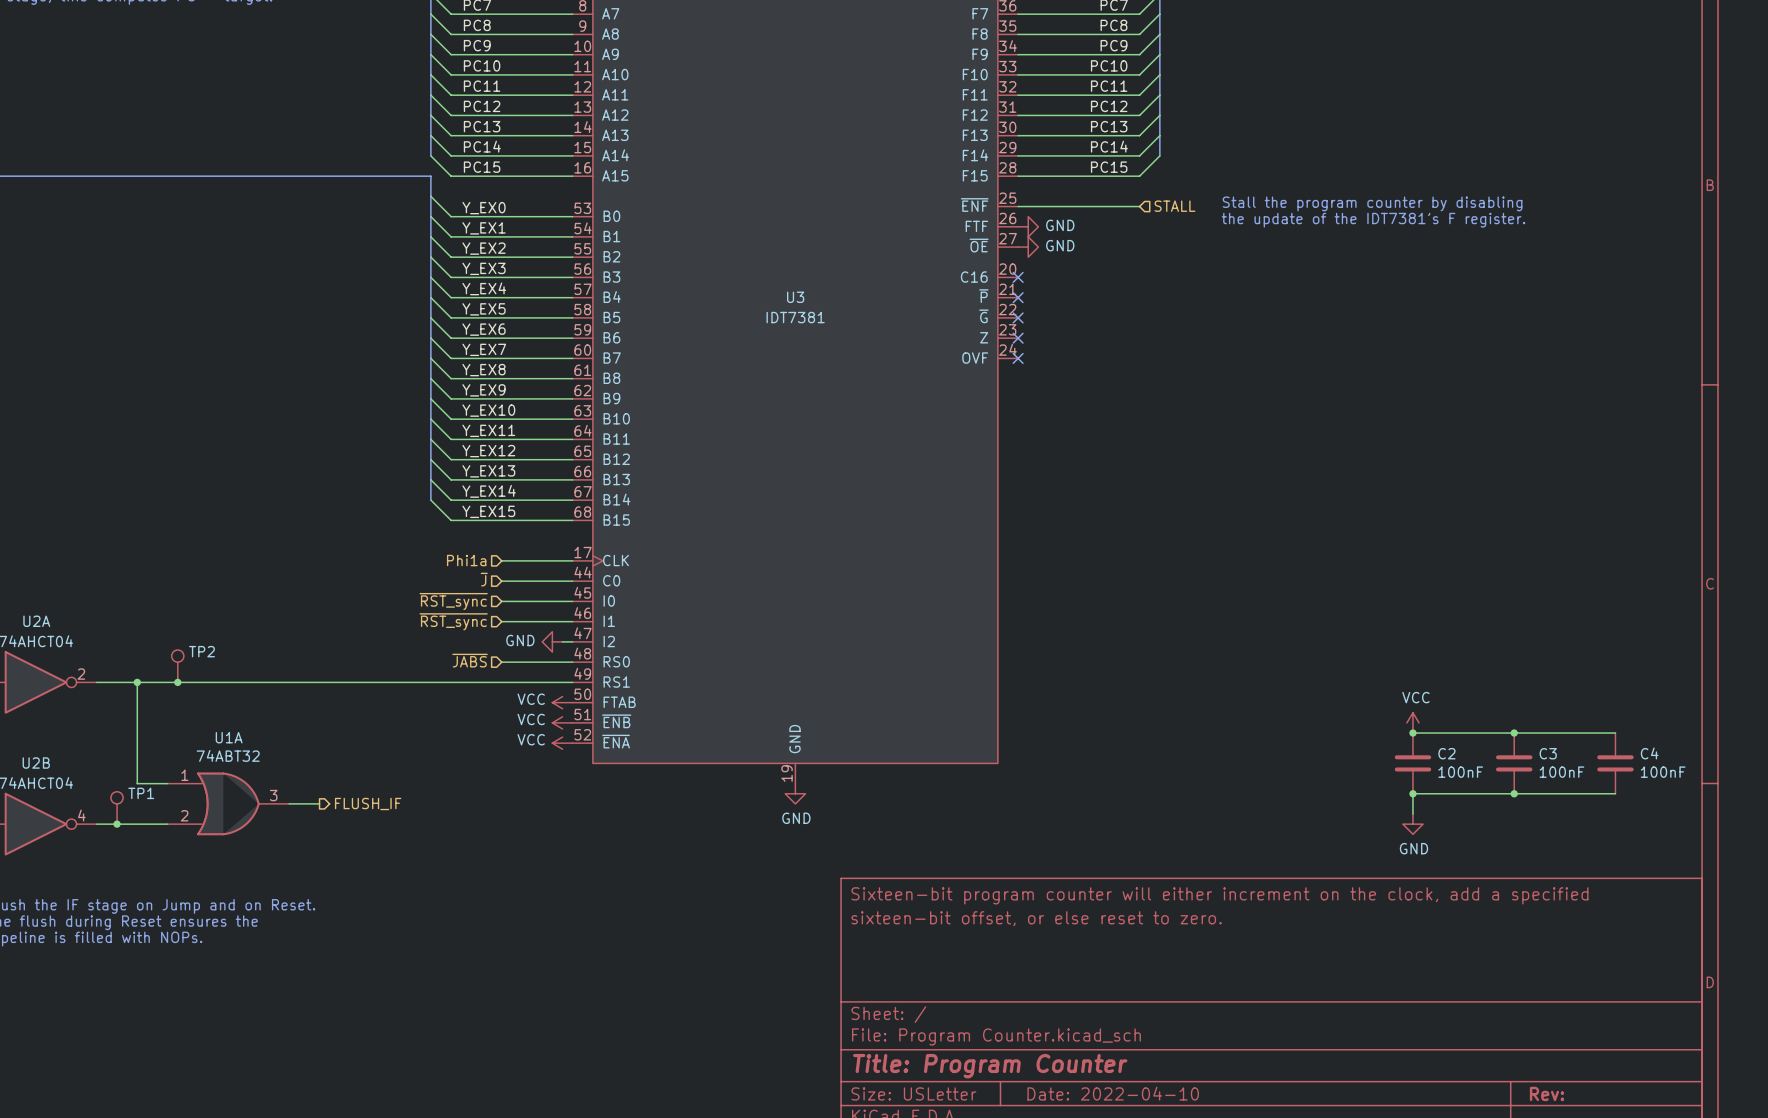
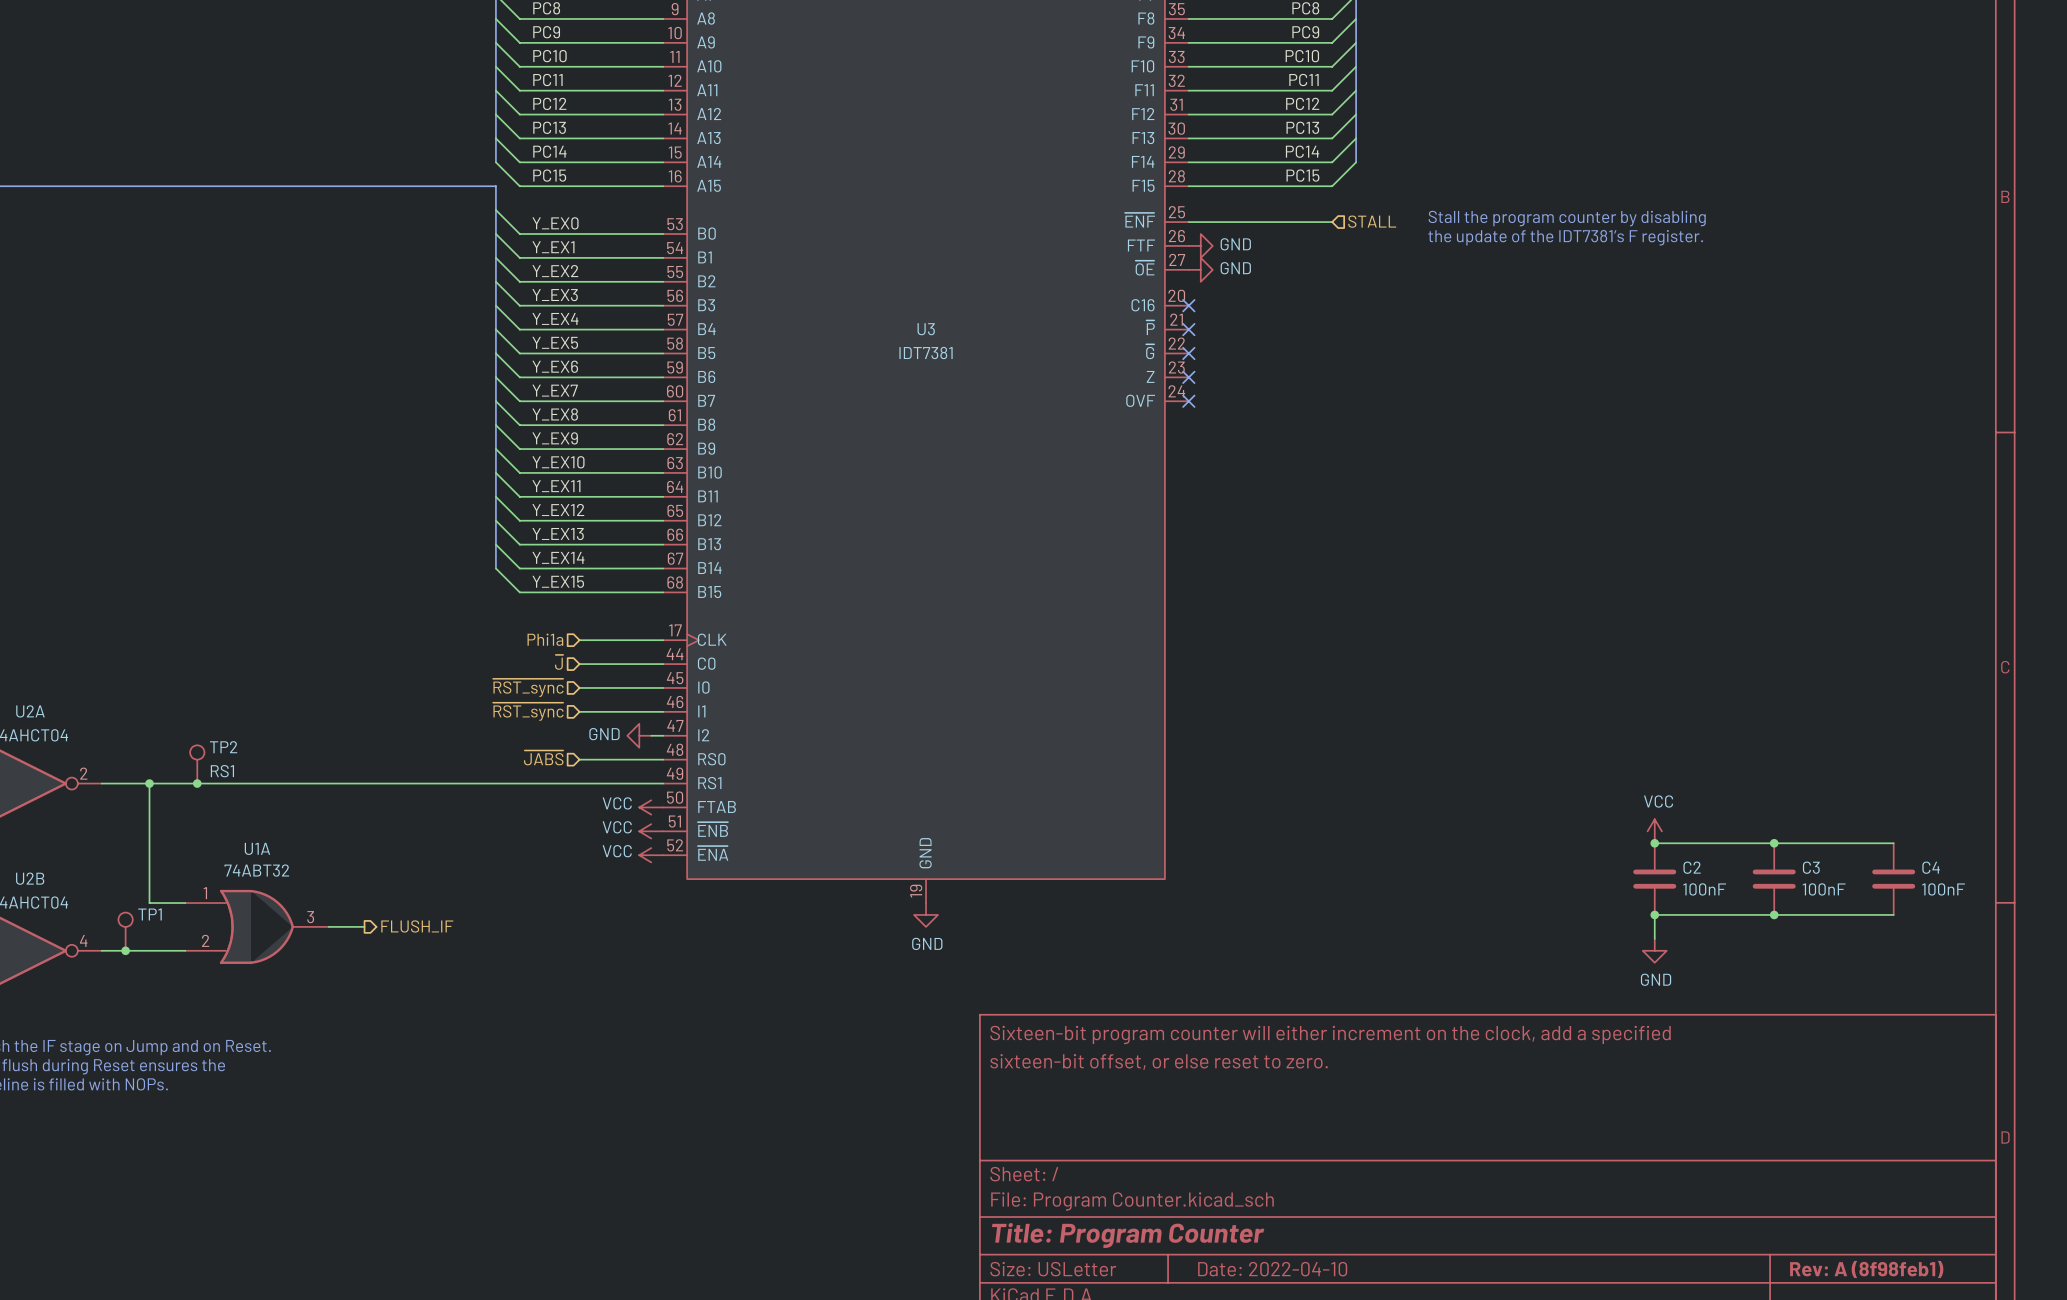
TP2 value: none -> RS1 (222, 771)
title block: Rev: (1547, 1093) -> Rev: A (8f98feb1) (1866, 1269)

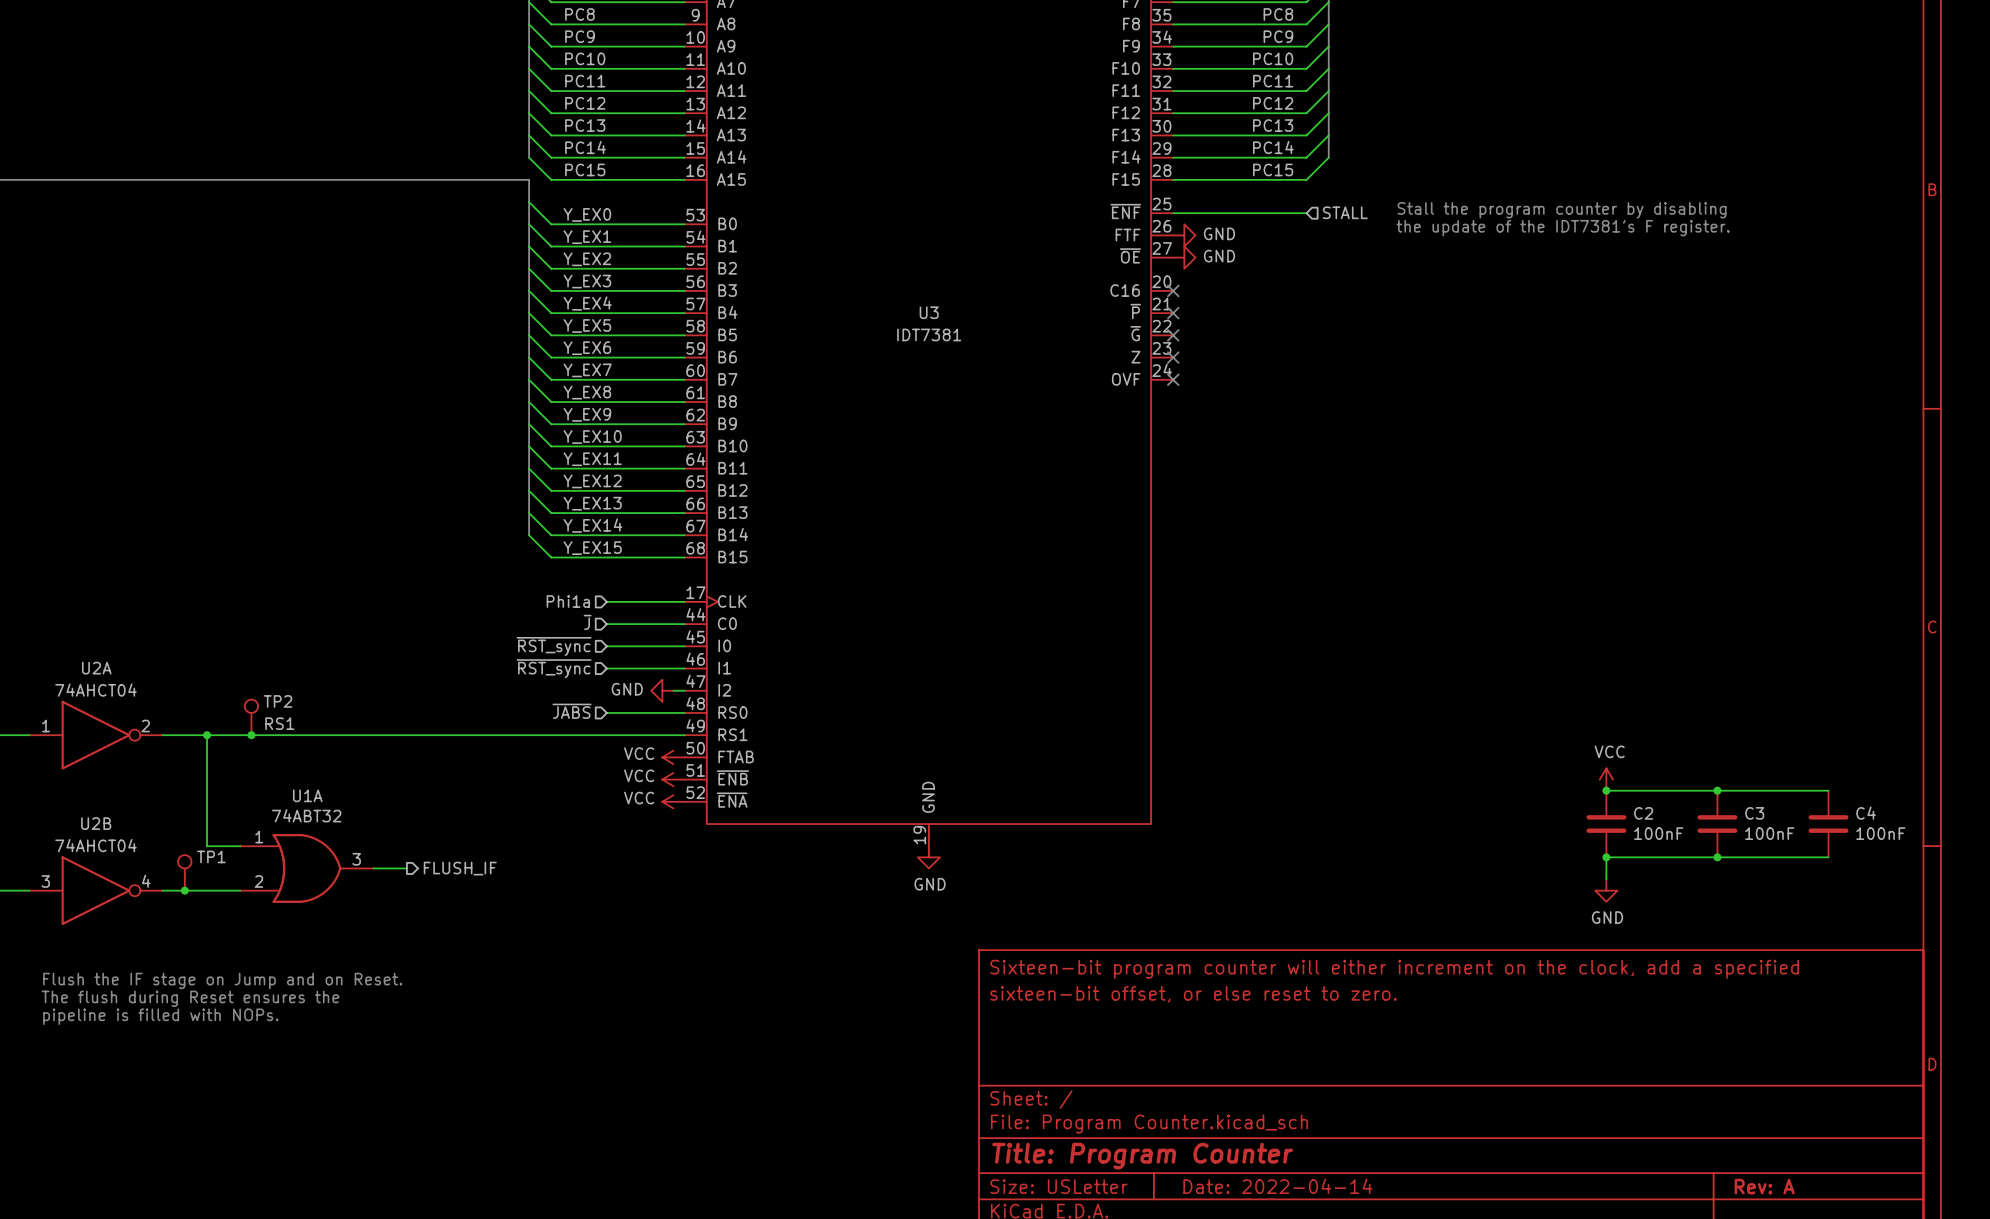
title block: Date: 2022-04-10 (1272, 1269) -> Date: 2022-04-14 (1277, 1186)
title block: Rev: A (8f98feb1) (1866, 1269) -> Rev: A (1764, 1186)

